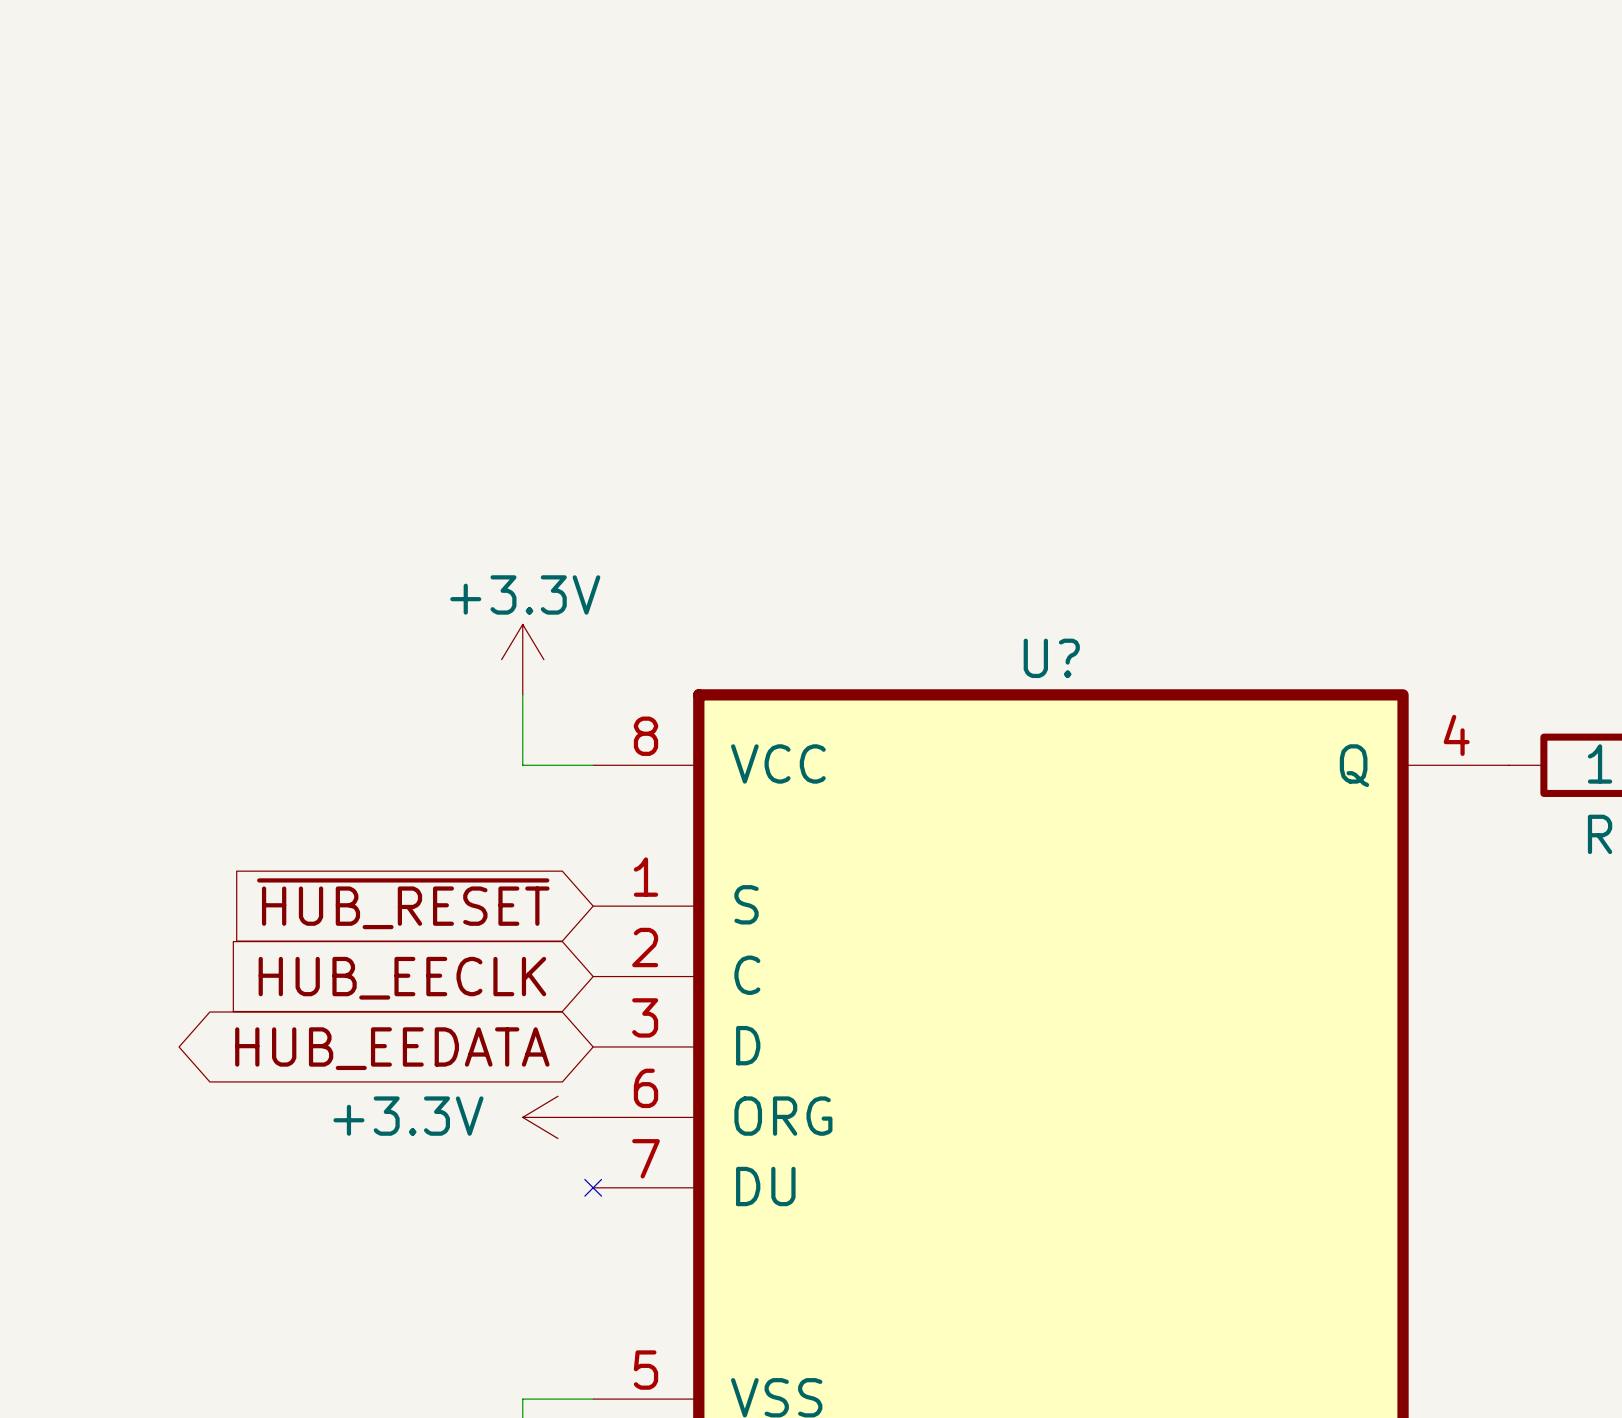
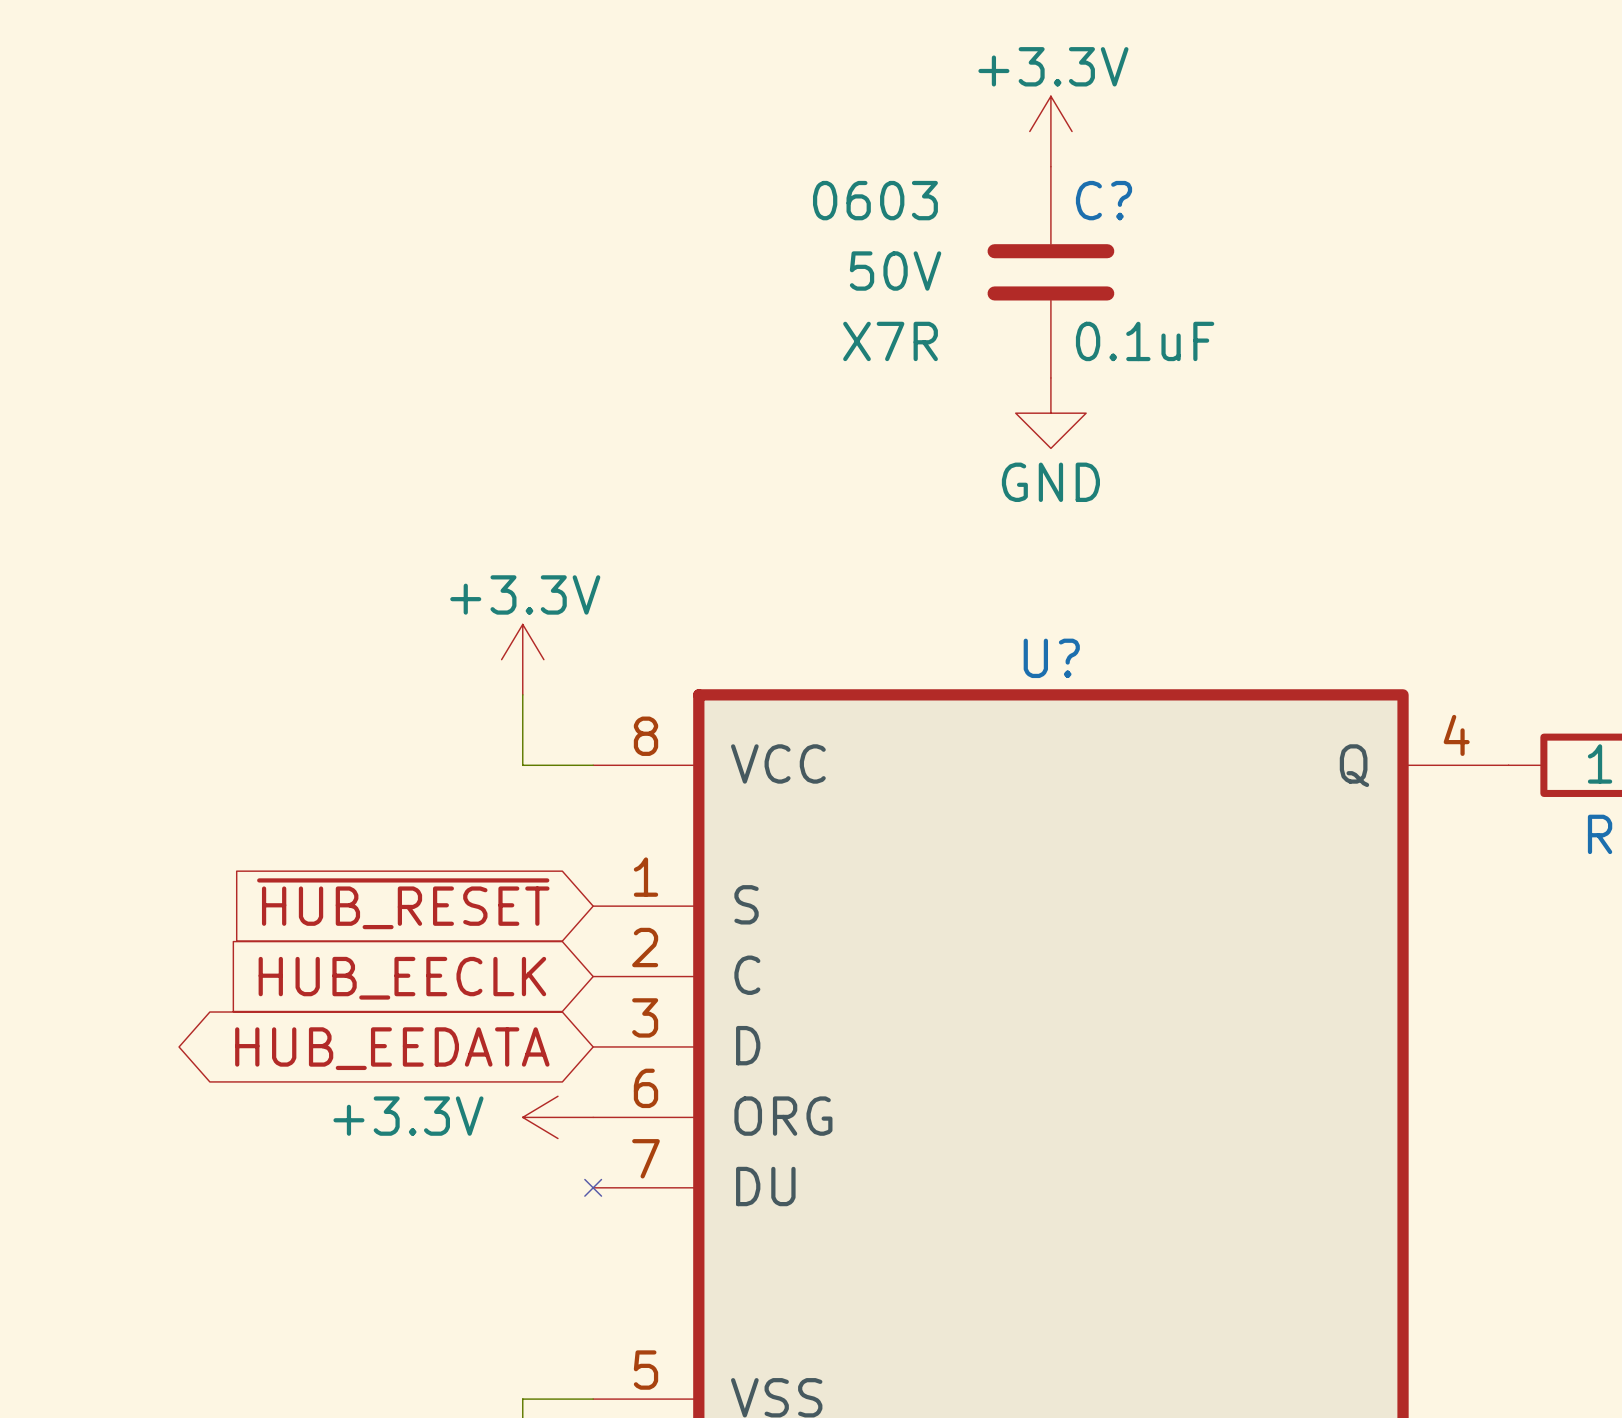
power symbol: none -> +3.3V (1050, 131)
C?: none -> 0.1uF (1050, 272)
power symbol: none -> GND (1050, 413)

